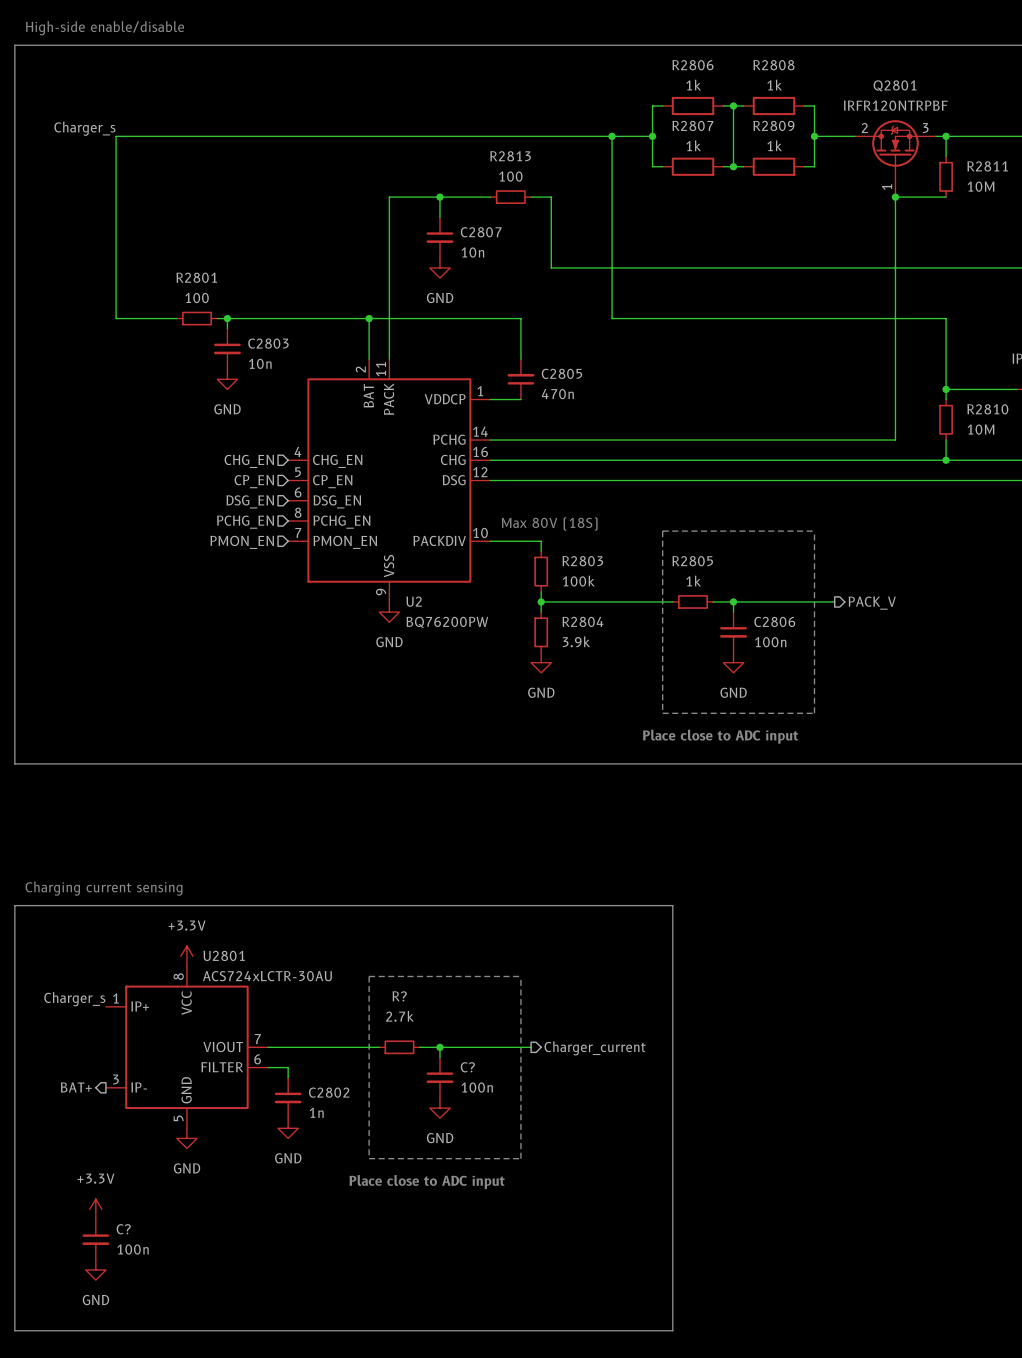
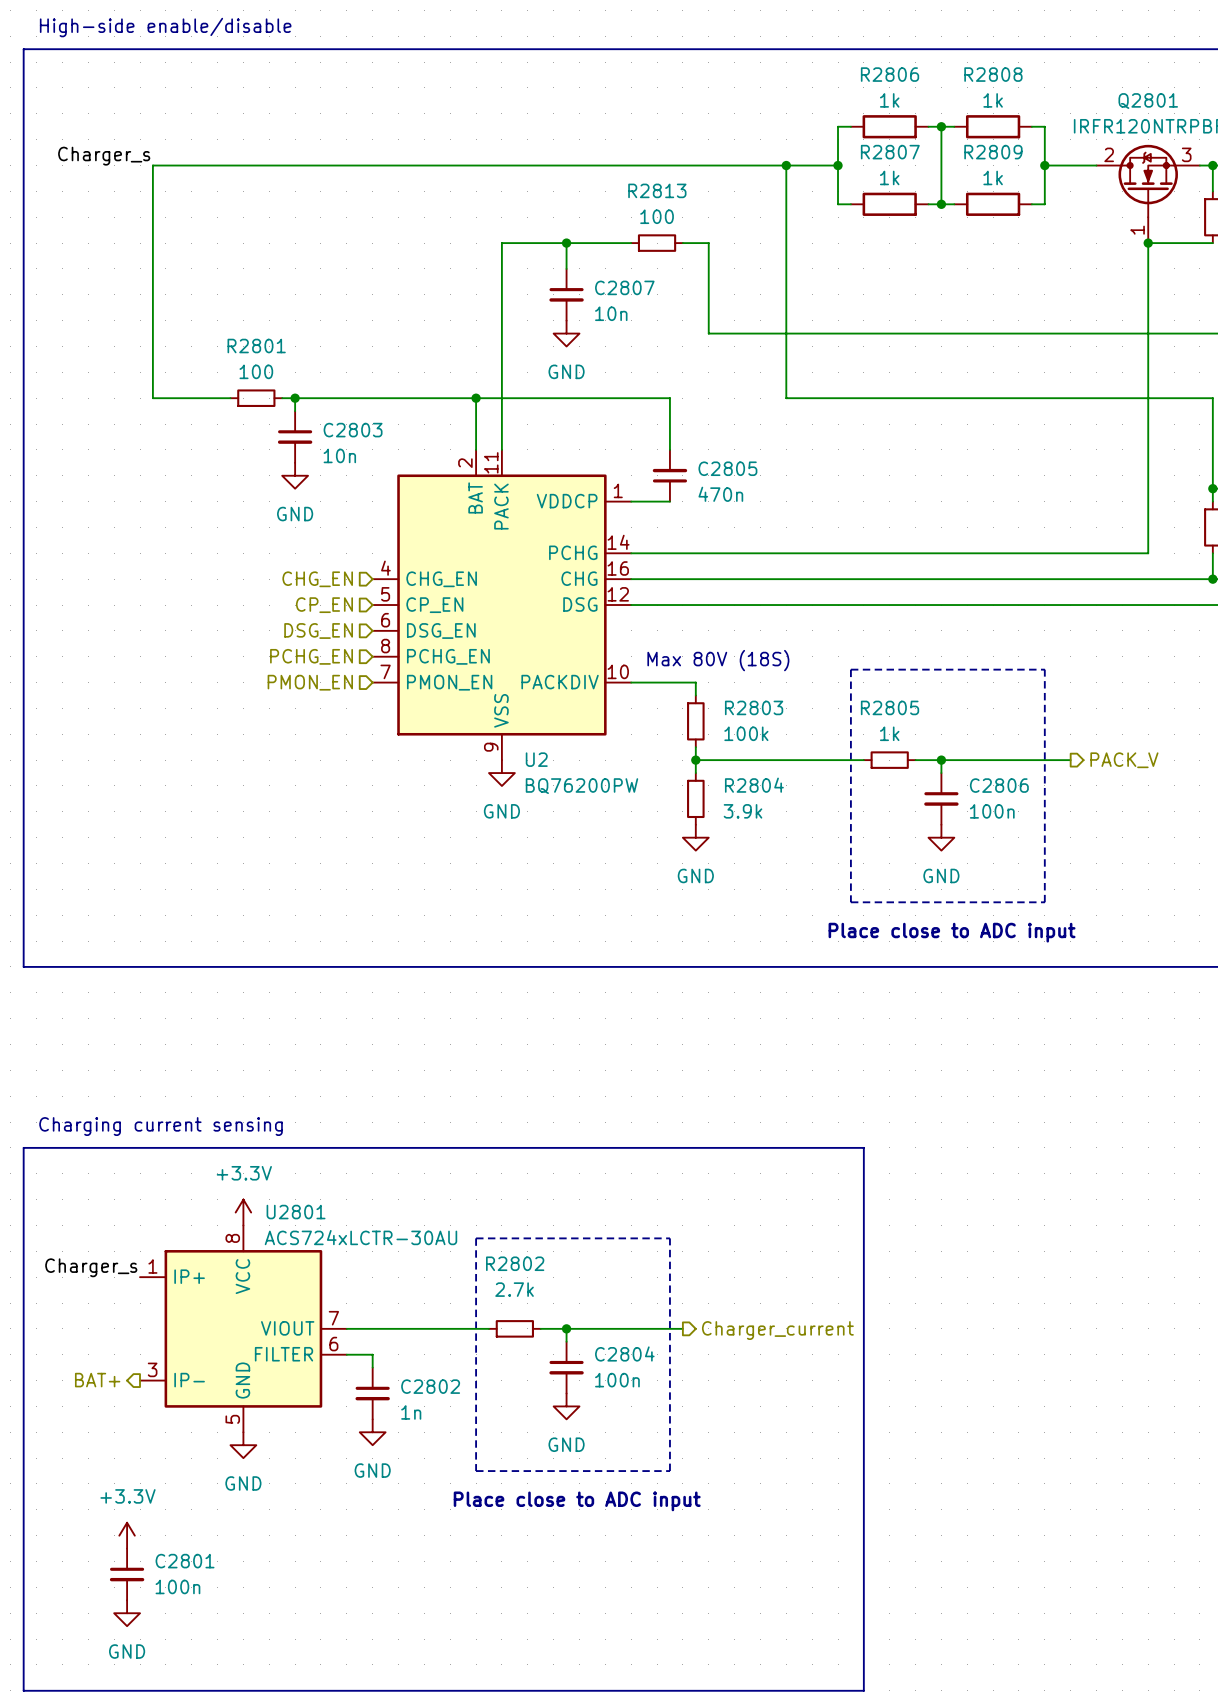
R? name: R? (399, 996) -> R2802 (515, 1263)
C? name: C? (467, 1067) -> C2804 (624, 1353)
C? name: C? (123, 1229) -> C2801 (185, 1561)

